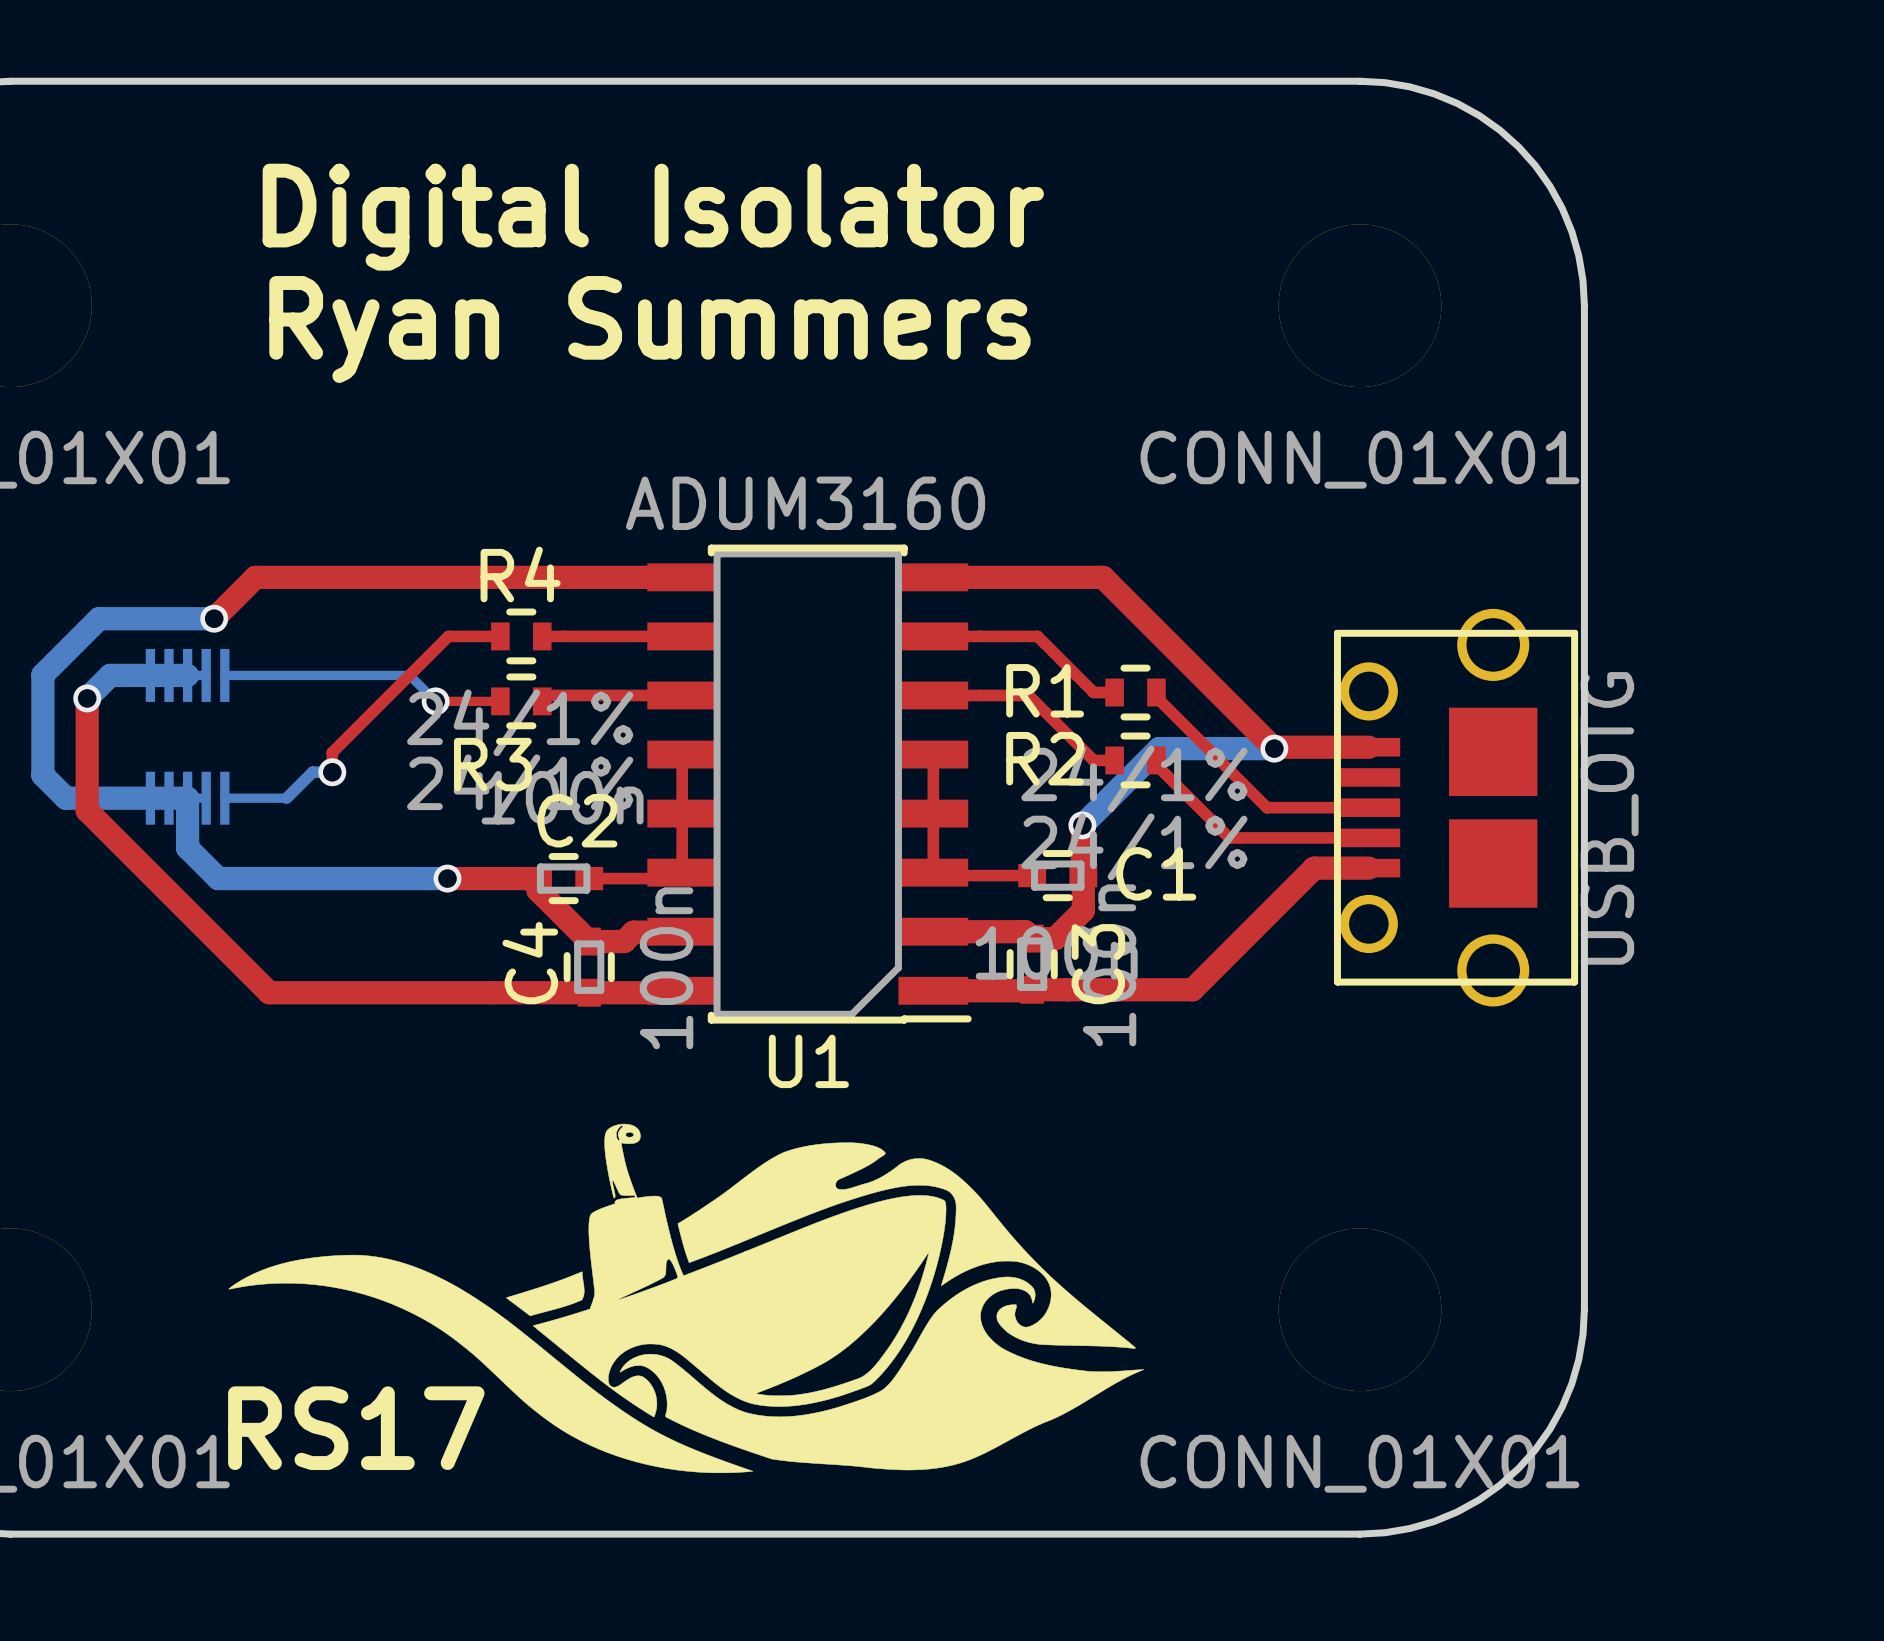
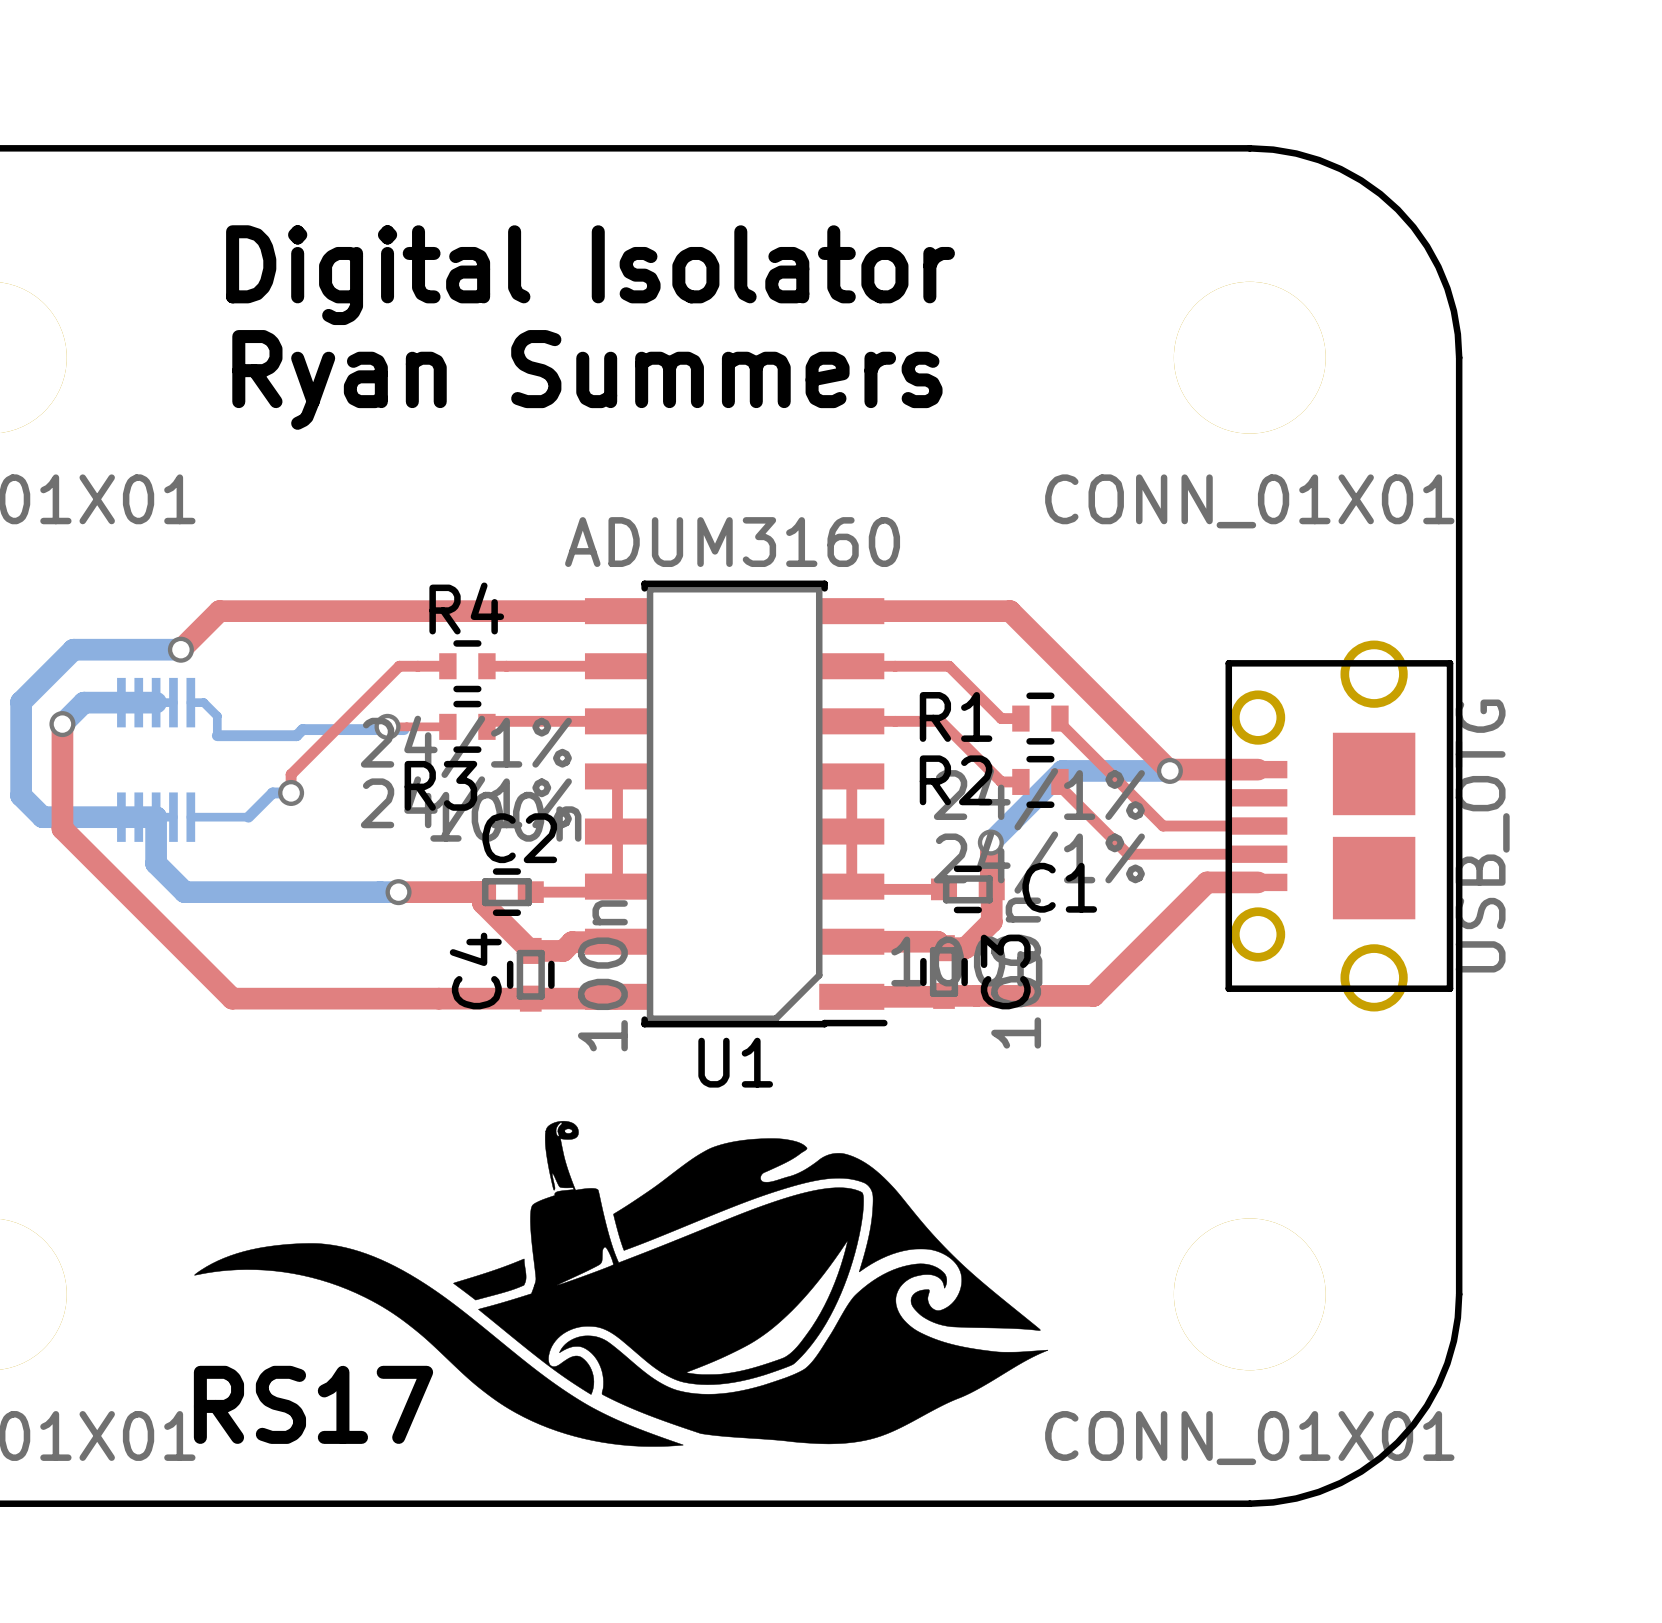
bottom track: (238, 675) (409, 675) (435, 701) -> (203, 702) (217, 716) (217, 735) (296, 735) (302, 729) (404, 729)

